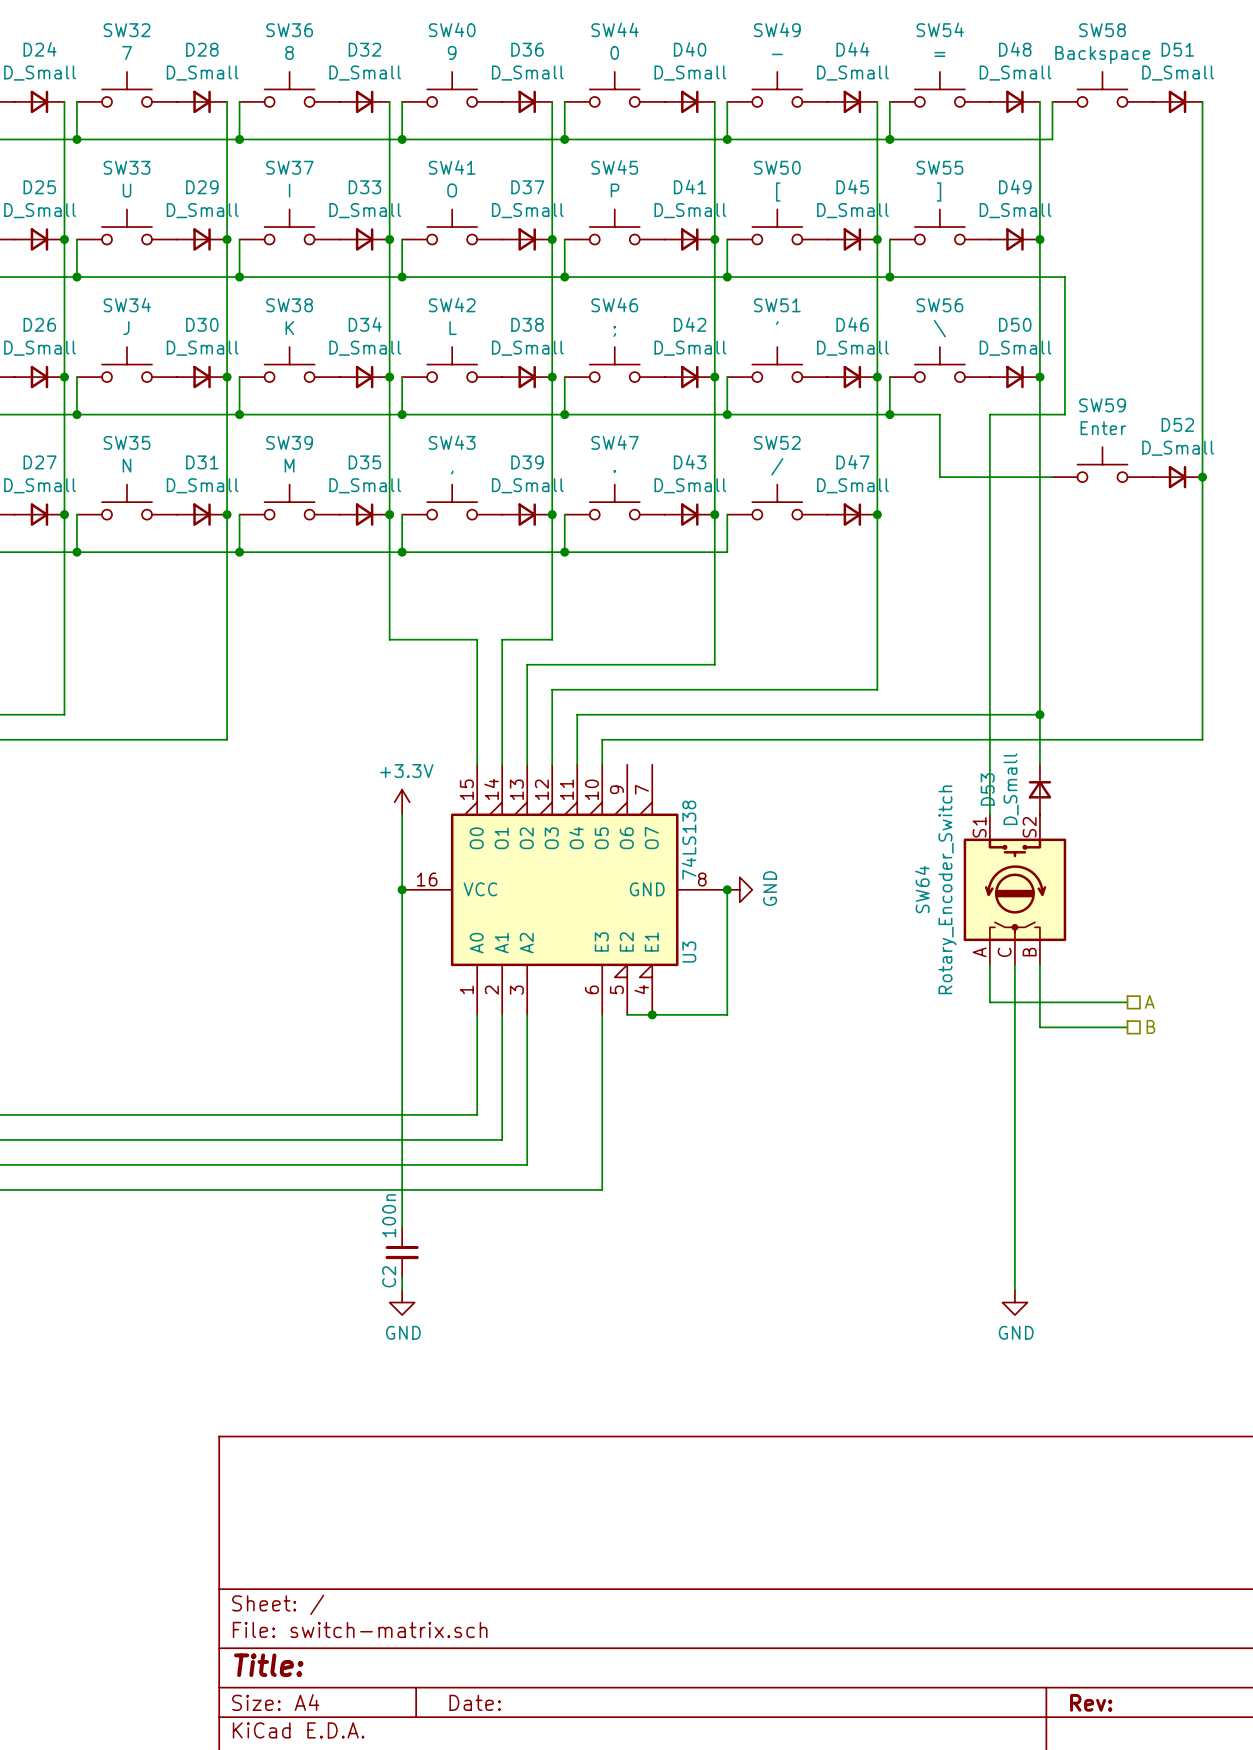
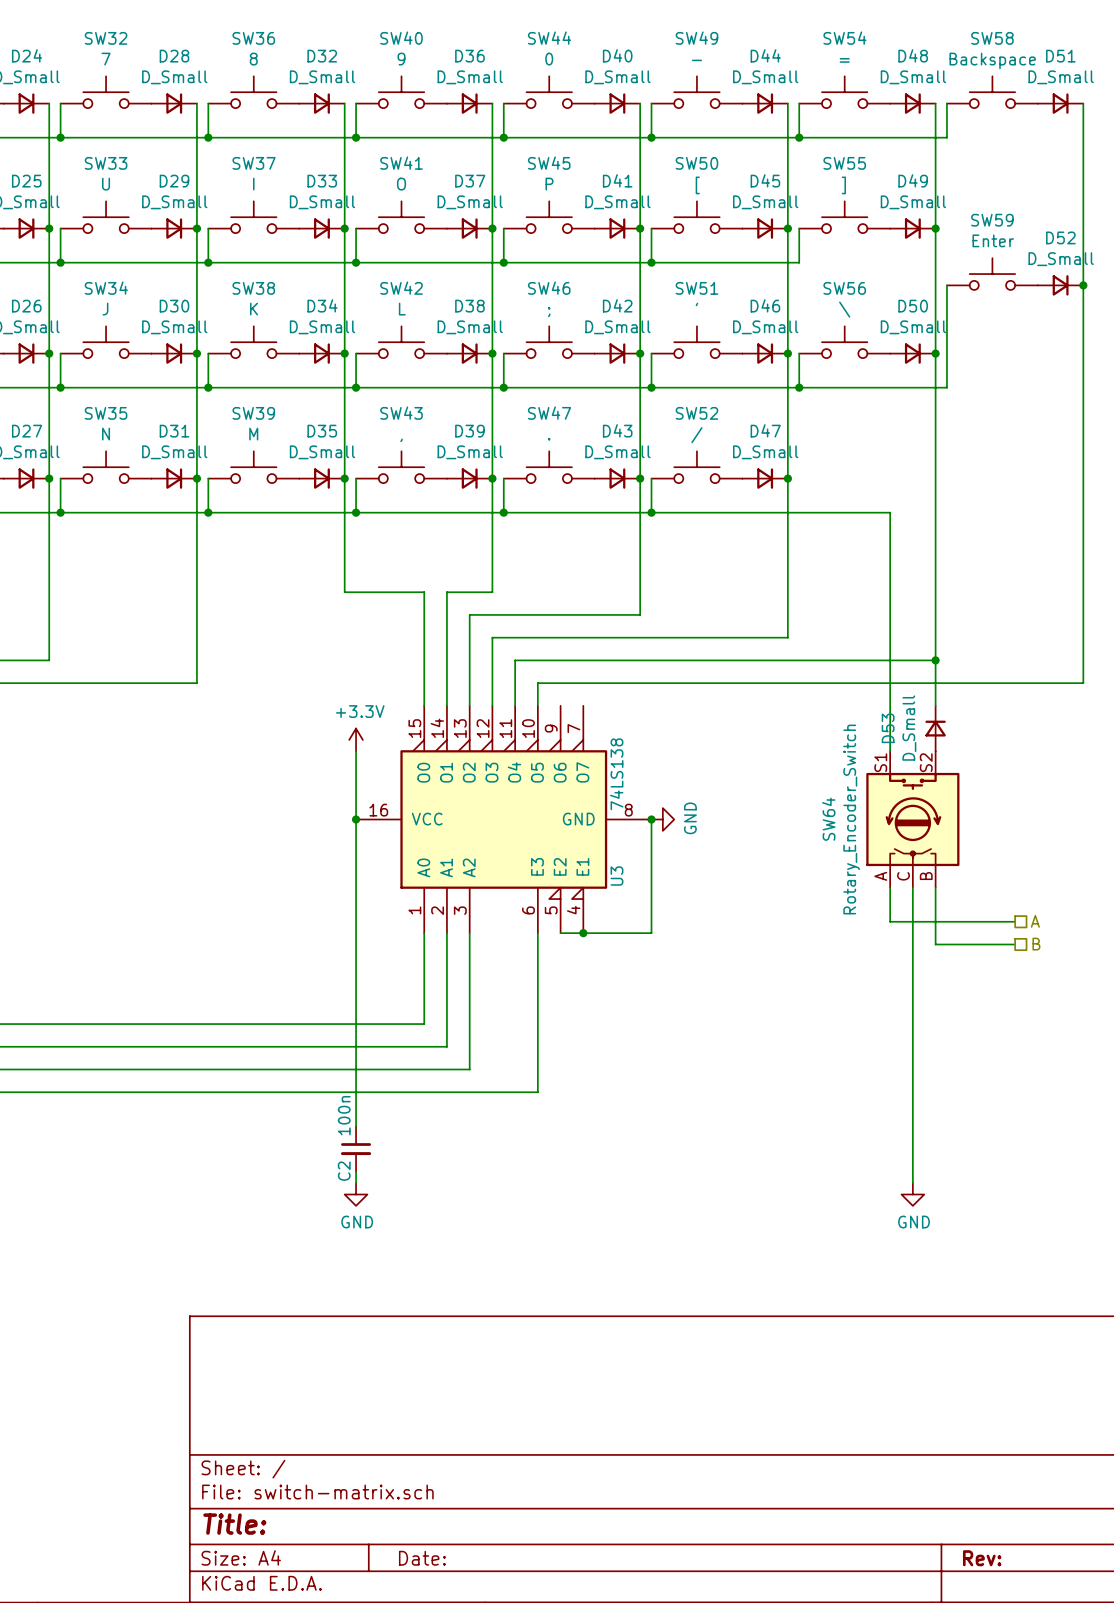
wire: (889, 277) (1064, 277) (1064, 414) (1052, 414) -> (946, 285) (946, 387)
junction: (889, 277) -> none
junction: none -> (1083, 285)
wire: (939, 414) (939, 477) (1052, 477) -> (844, 387) (890, 387)
wire: (989, 414) (989, 552) -> (651, 512) (890, 512)
SW59 position: (1102, 464) -> (992, 274)
D52 position: (1177, 477) -> (1060, 285)
junction: (1202, 477) -> none
junction: none -> (651, 512)

